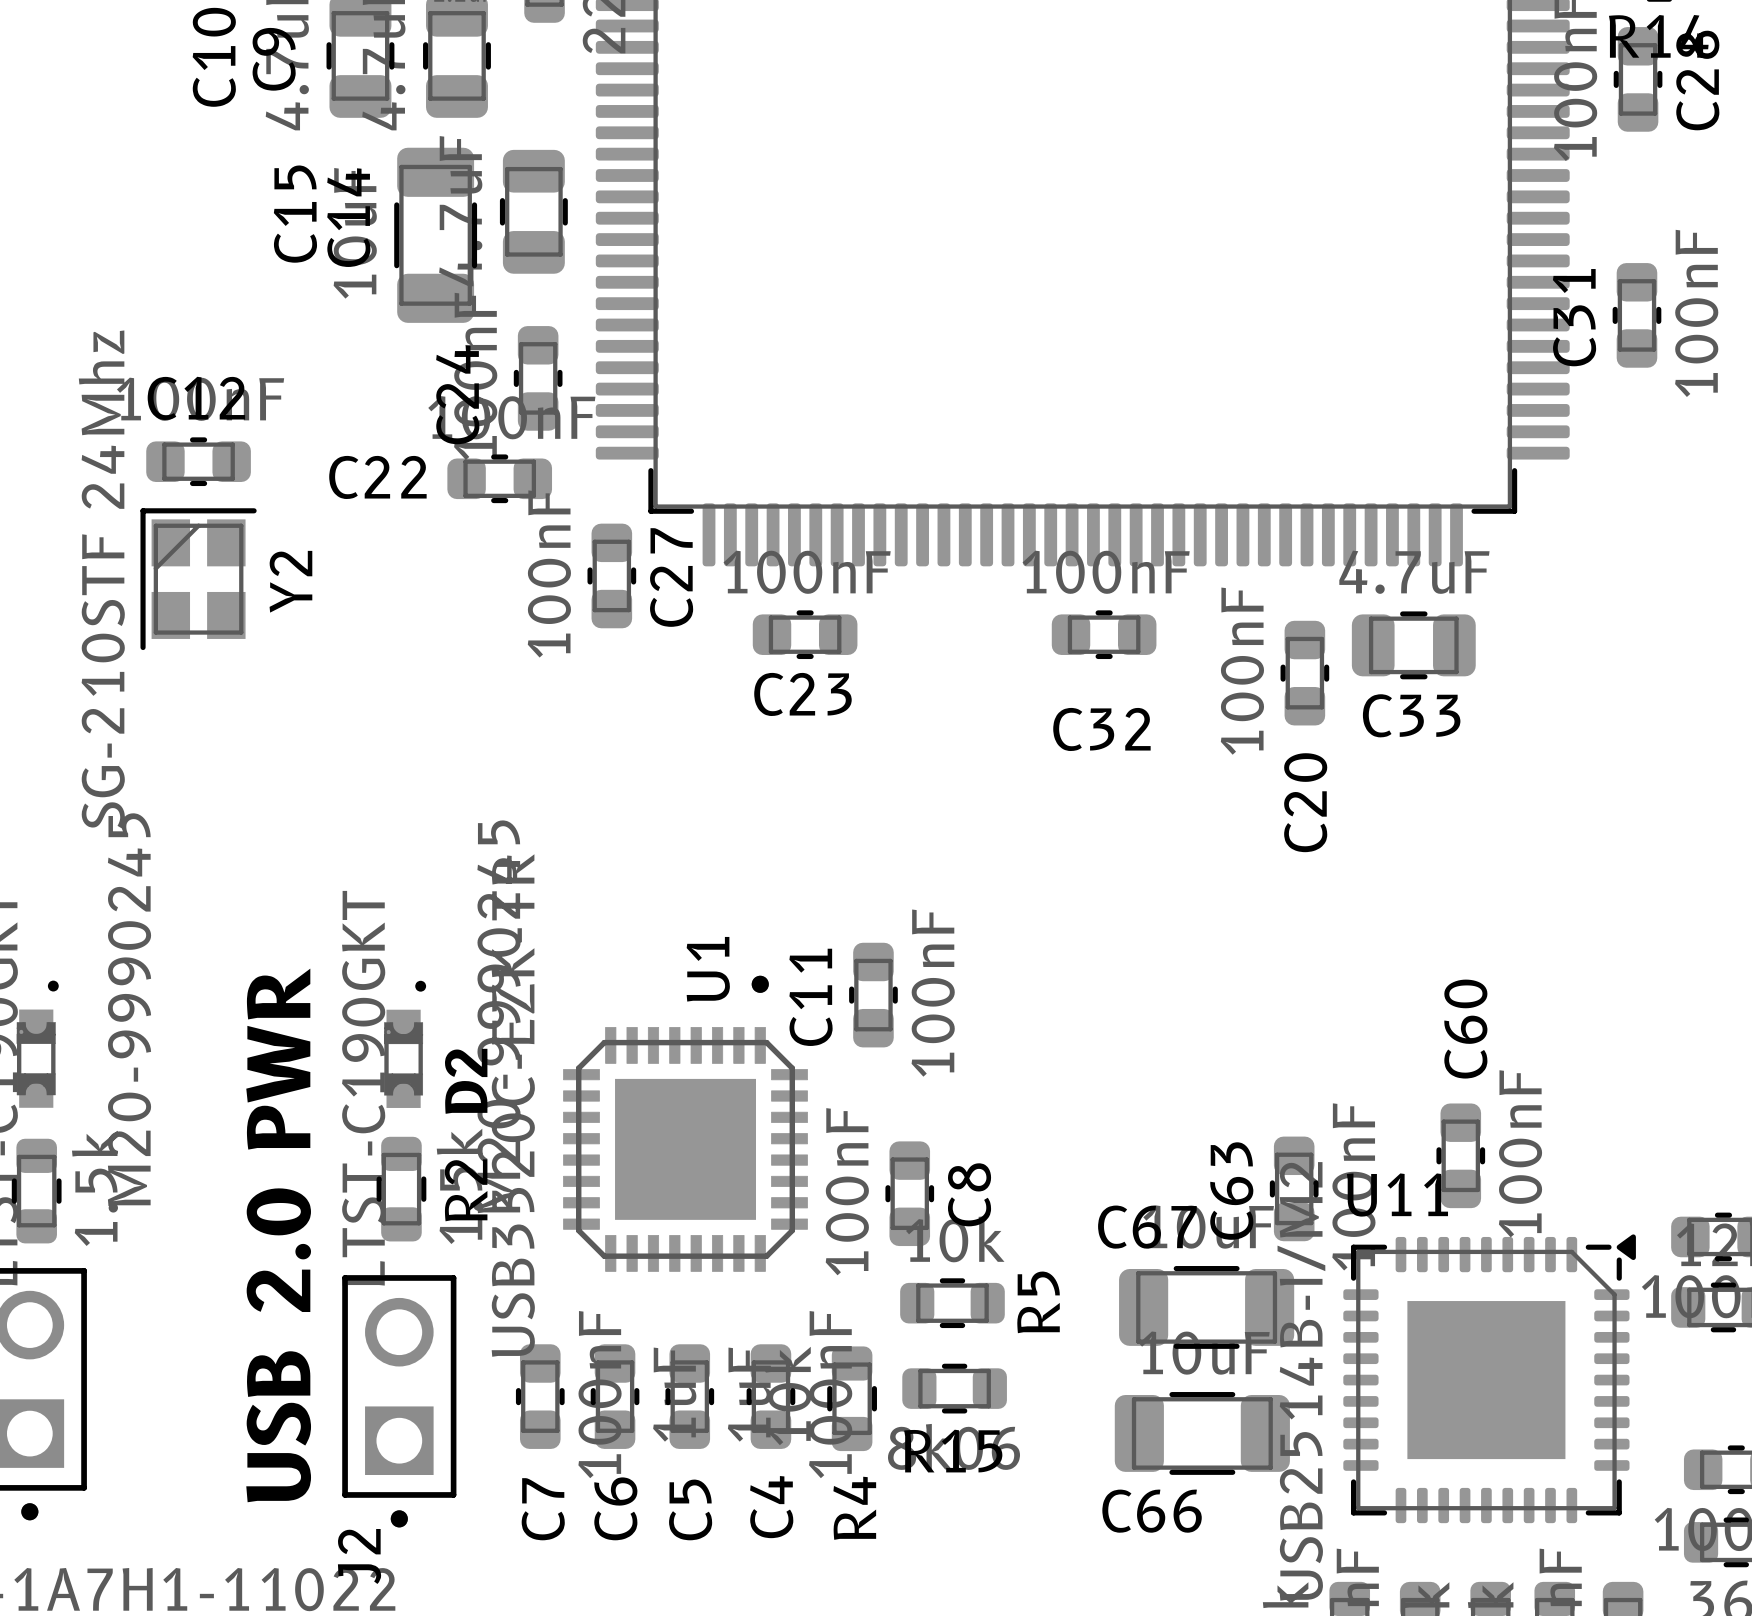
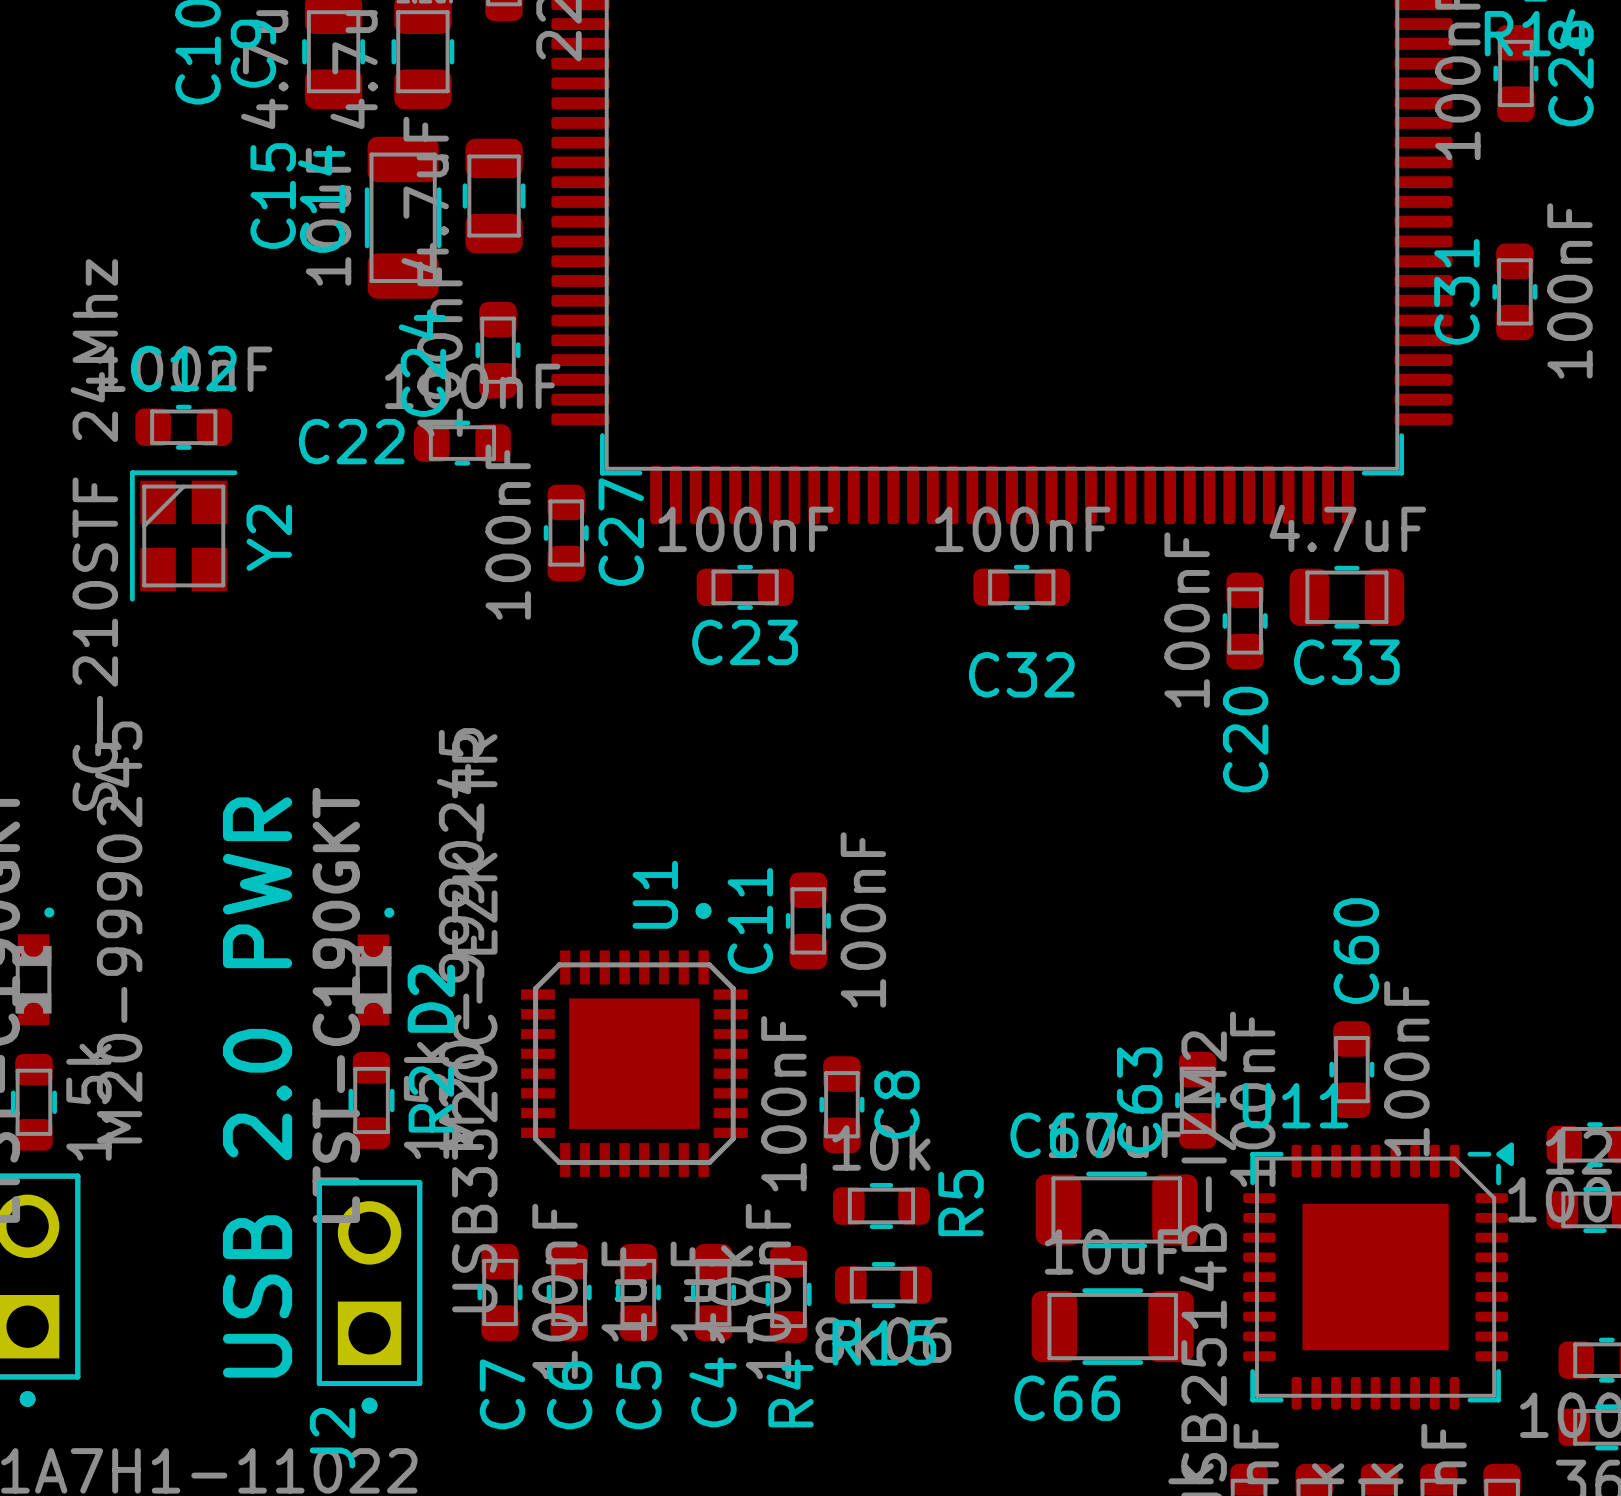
C33 position: (1413, 645) -> (1346, 597)
C20 position: (1304, 673) -> (1245, 620)

